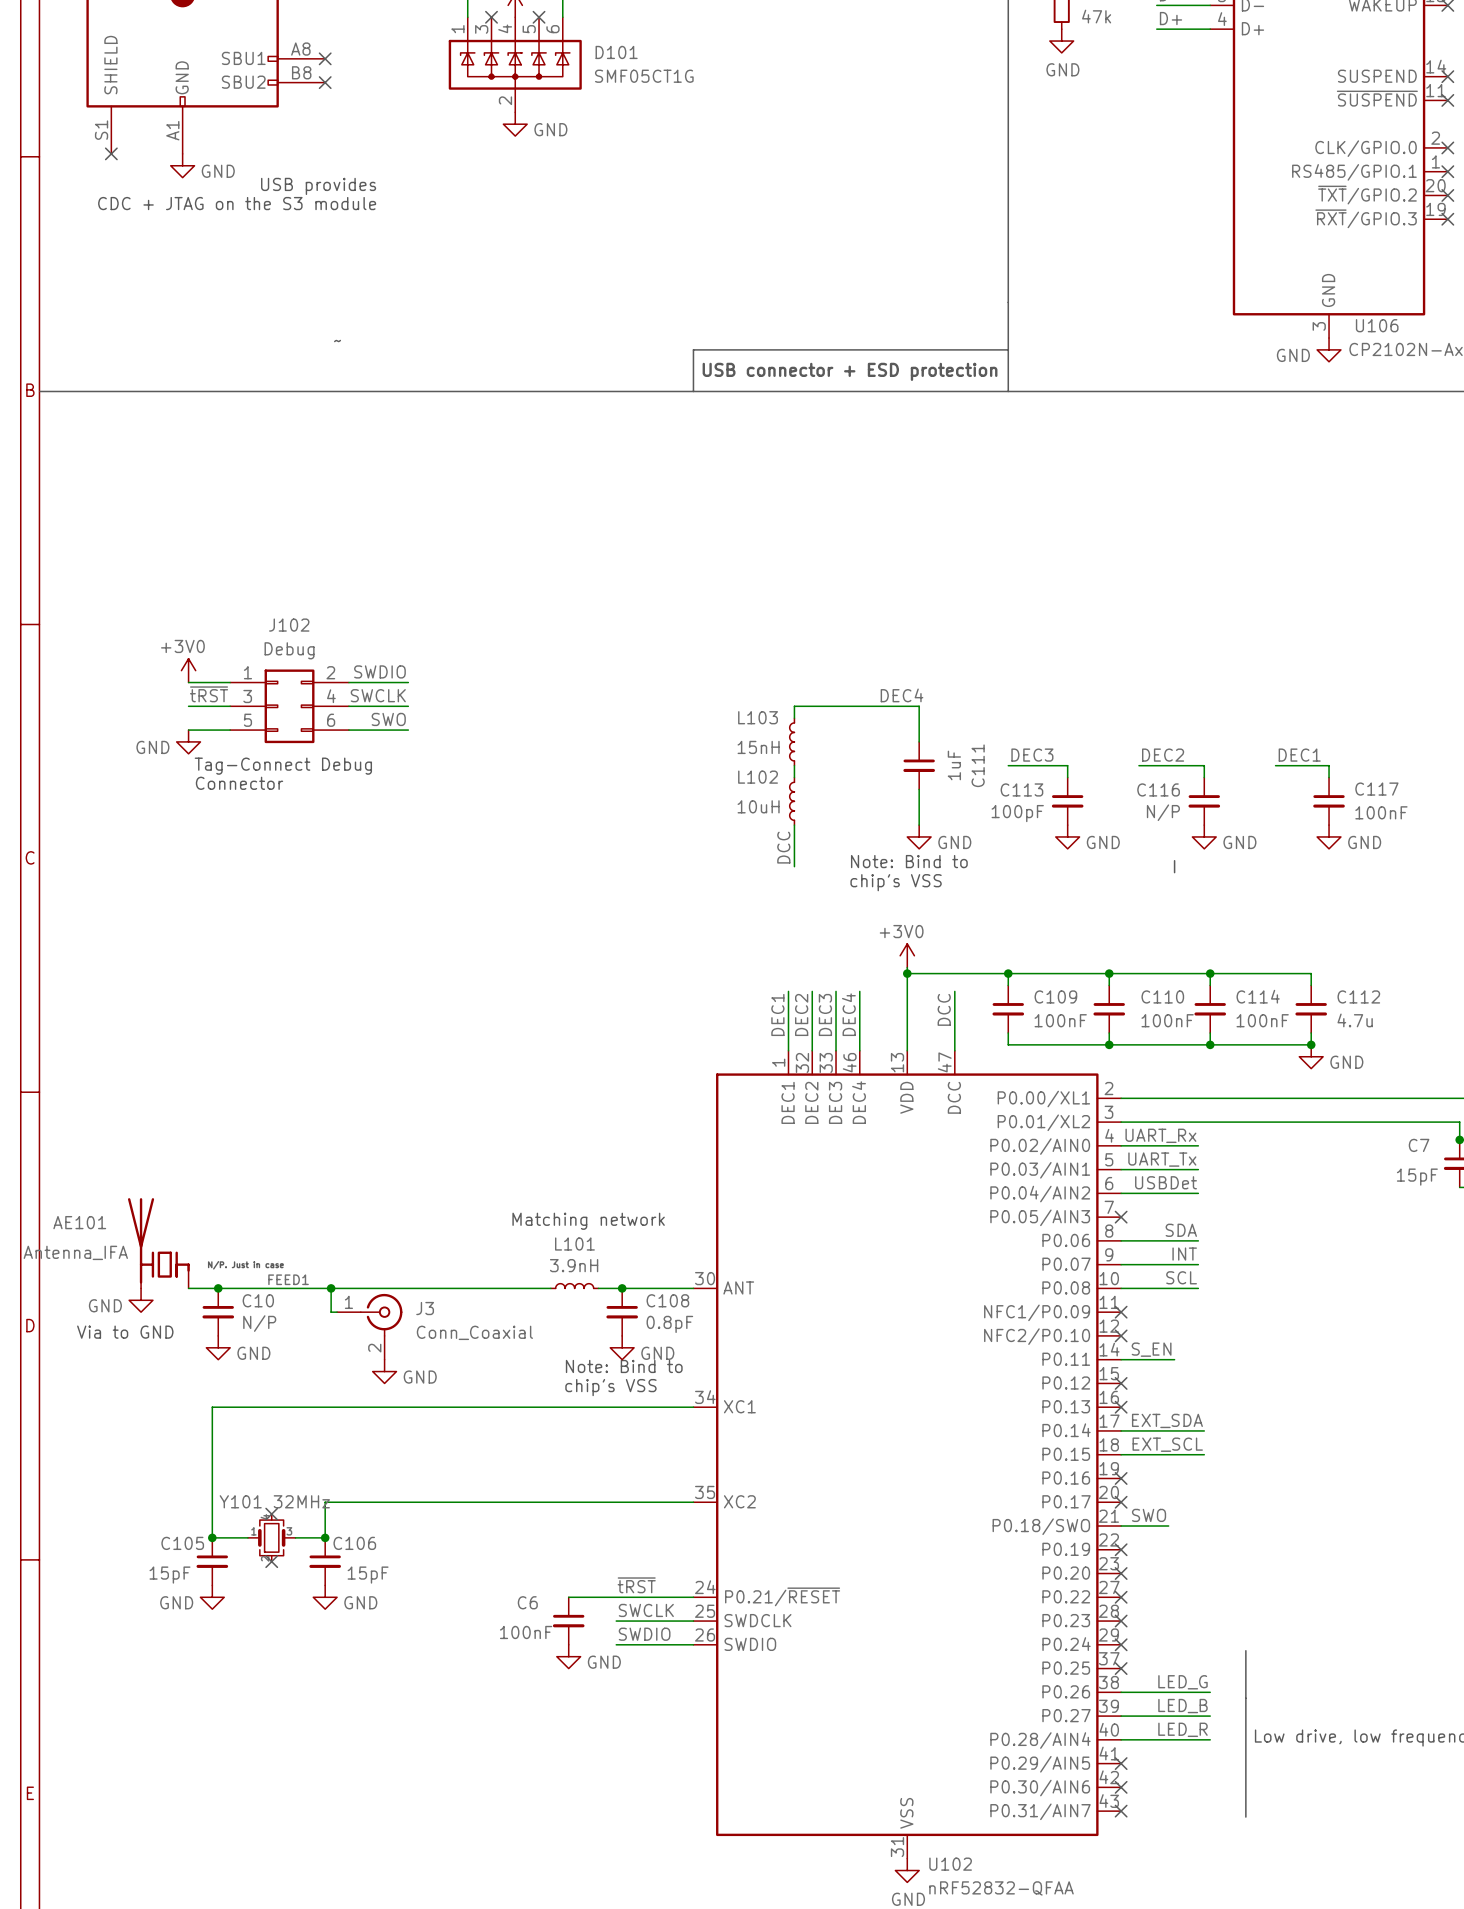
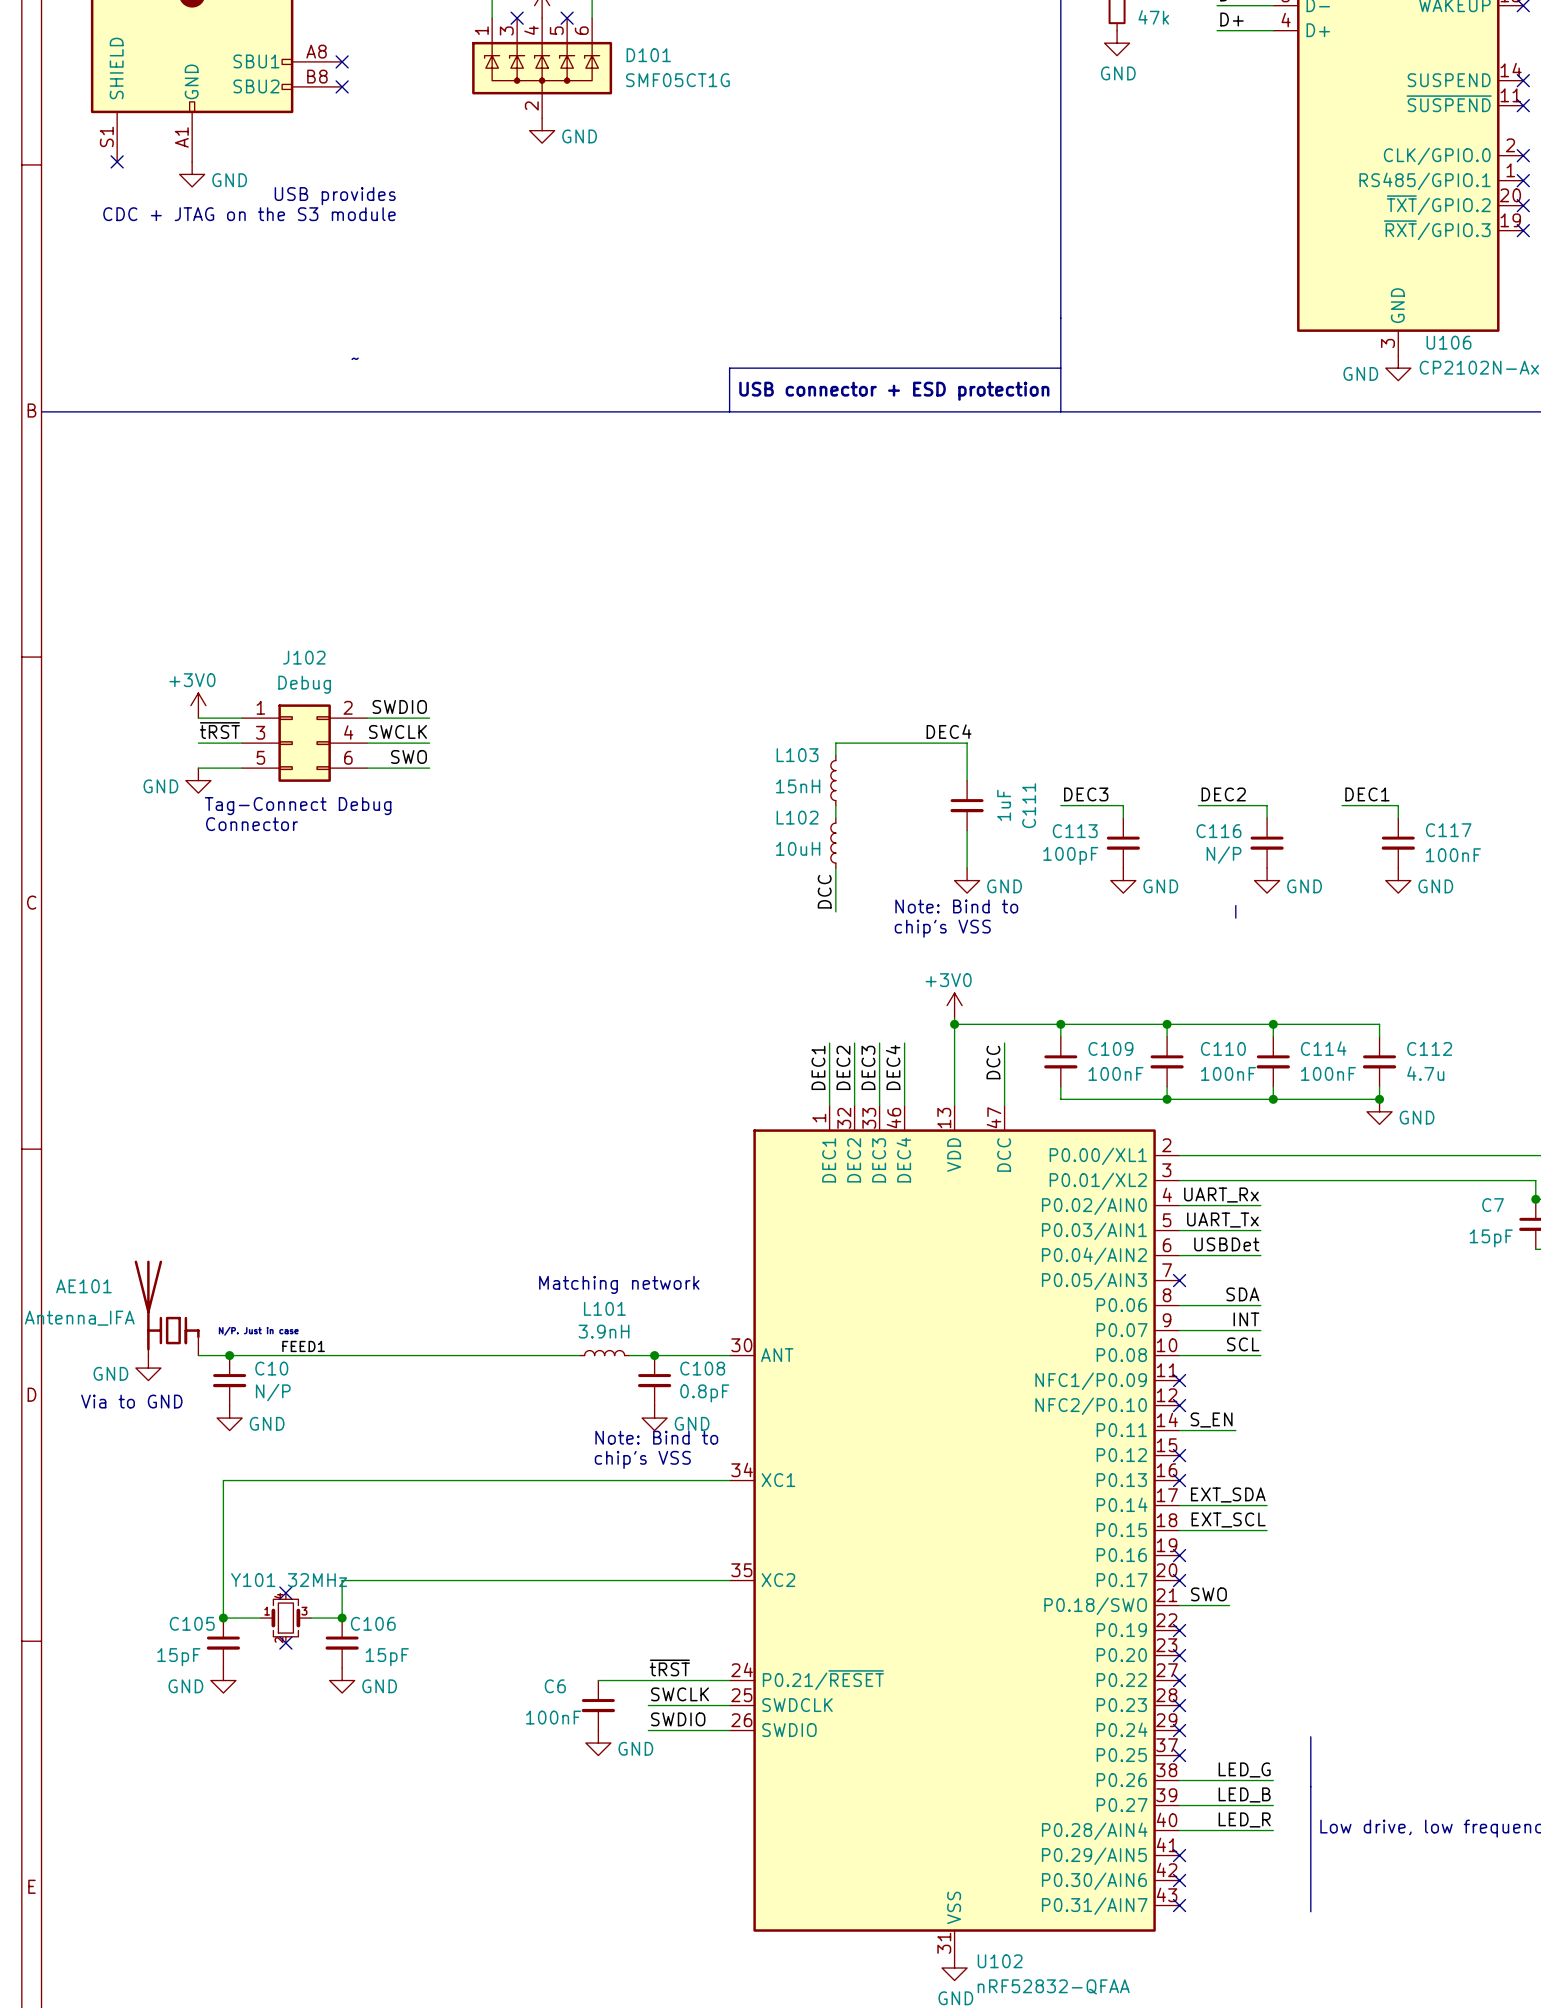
wire: (331, 1288) (331, 1312) (337, 1312) -> none
junction: (331, 1288) -> none
J3: Conn_Coaxial (369, 1326) -> none
power symbol: GND (384, 1371) -> none

